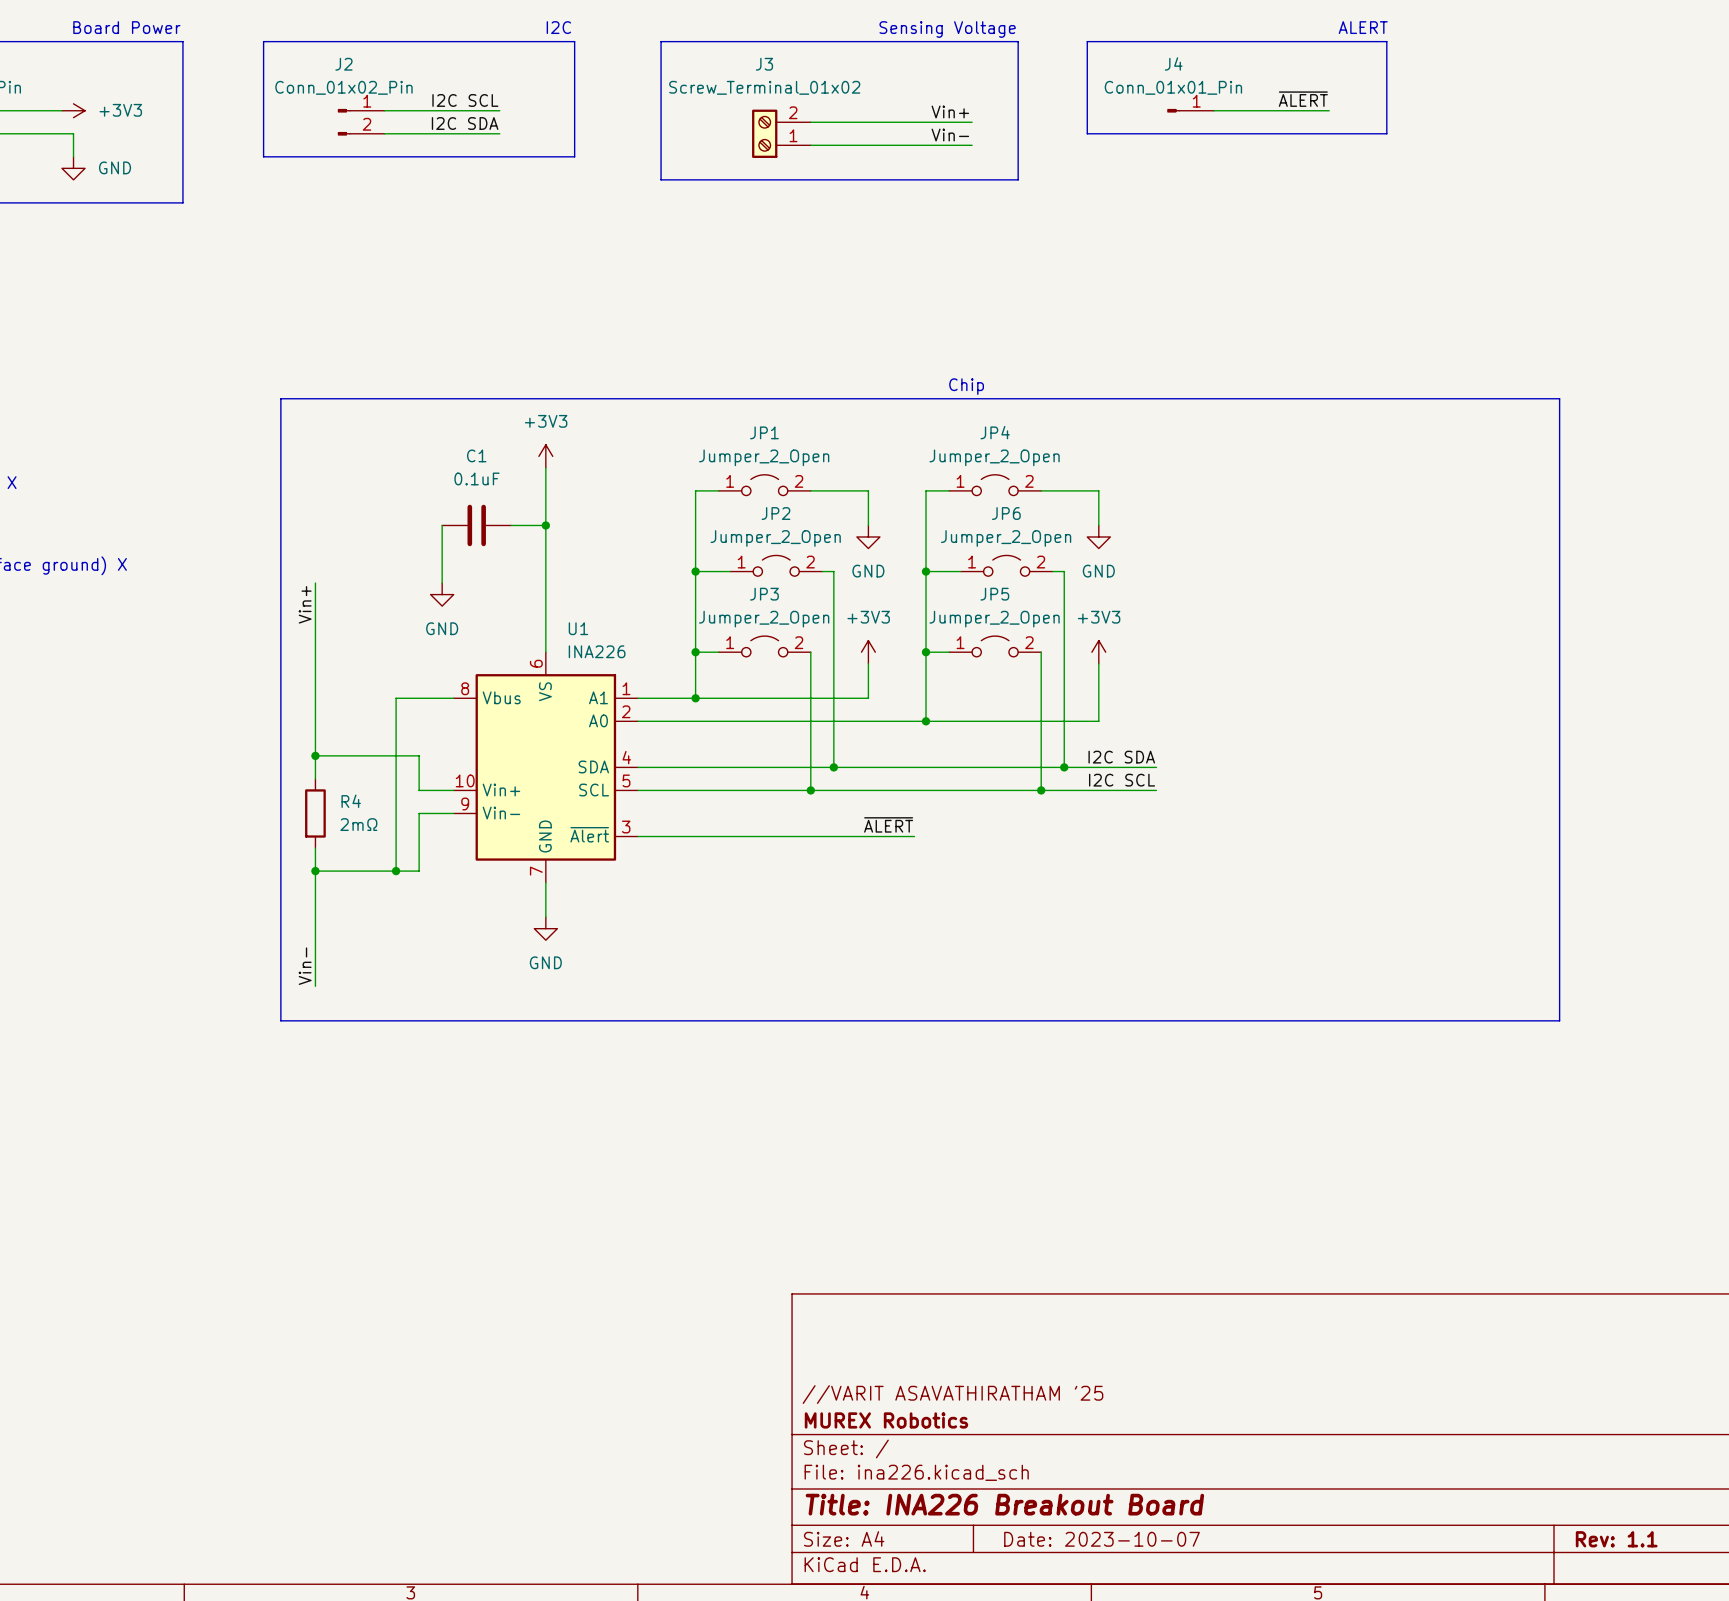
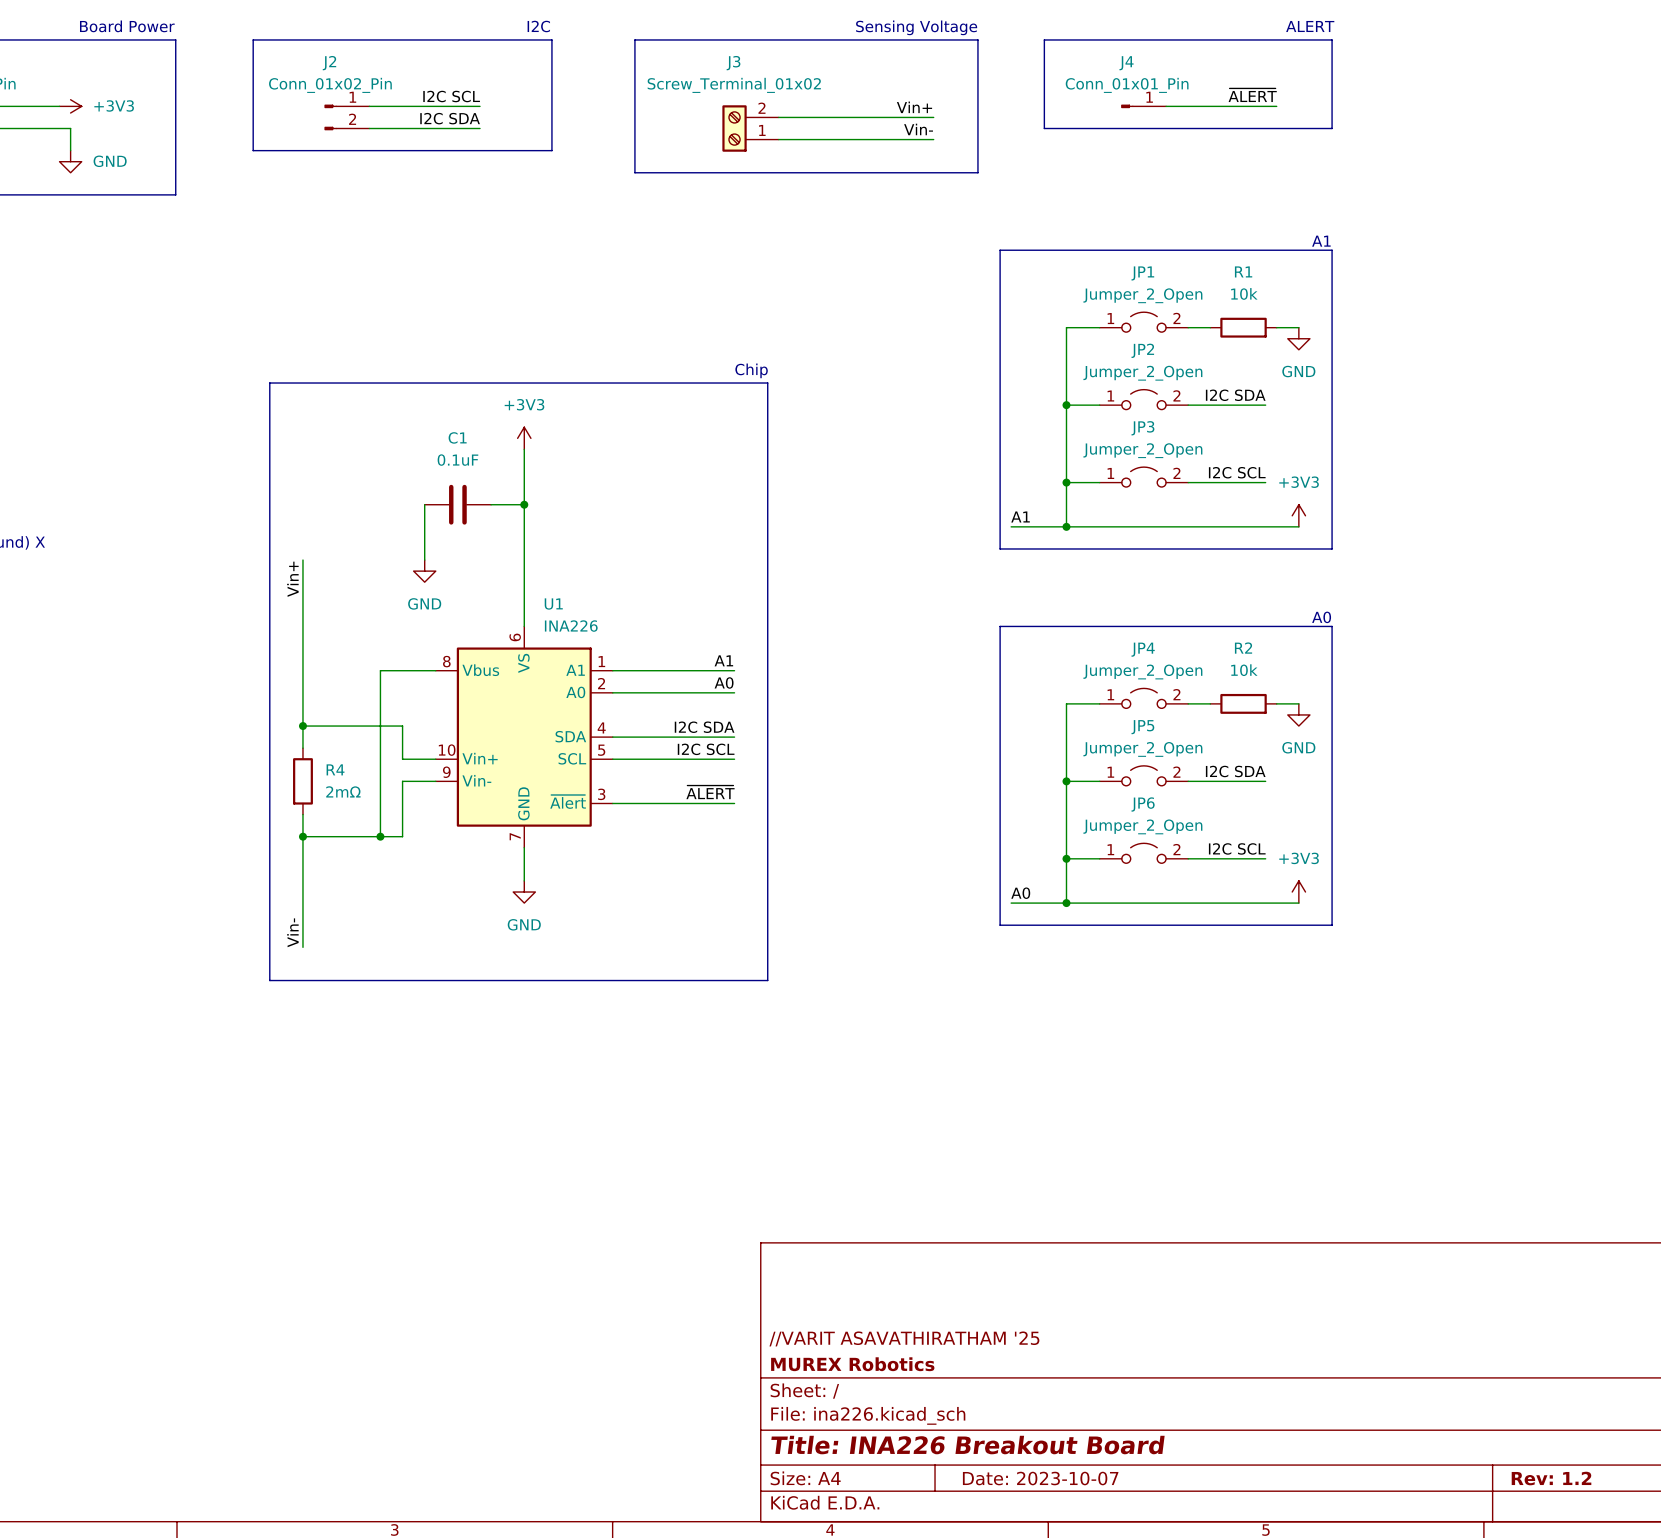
text: none -> A1 (1321, 241)
line: none -> (1000, 250) (1332, 250) (1332, 548) (1000, 548) (1000, 250)
wire: none -> (1099, 327) (1066, 327) (1066, 526)
wire: none -> (1188, 327) (1210, 327)
R1: none -> 10k (1243, 327)
wire: none -> (1276, 327) (1298, 327)
power symbol: none -> GND (1298, 338)
text position: Chip (966, 386) -> Chip (751, 370)
line: (799, 398) (1559, 398) (1559, 1020) (799, 1020) -> (767, 383) (767, 980)
label: none -> I2C SDA (1235, 395)
wire: none -> (1066, 405) (1099, 405)
junction: none -> (1066, 405)
wire: none -> (1188, 405) (1265, 405)
JP1 position: (764, 485) -> (1143, 322)
JP4 position: (995, 485) -> (1143, 698)
wire: (718, 490) (695, 490) (695, 698) -> none
wire: (810, 490) (868, 490) (868, 525) -> none
wire: (949, 490) (926, 490) (926, 721) -> none
wire: (1041, 490) (1098, 490) (1098, 525) -> none
label: none -> I2C SCL (1237, 472)
junction: none -> (1066, 482)
wire: none -> (1188, 482) (1265, 482)
power symbol: GND (868, 536) -> none
power symbol: GND (1098, 536) -> none
power symbol: none -> +3V3 (1298, 515)
label: none -> A1 (1020, 516)
wire: none -> (1011, 526) (1298, 526)
junction: none -> (1066, 526)
JP2 position: (776, 565) -> (1143, 399)
JP6 position: (1006, 565) -> (1143, 853)
wire: (695, 571) (730, 571) -> none
junction: (695, 571) -> none
wire: (822, 571) (833, 571) (833, 767) -> none
wire: (926, 571) (960, 571) -> (1066, 482) (1099, 482)
junction: (926, 571) -> none
wire: (1052, 571) (1064, 571) (1064, 767) -> none
text: none -> A0 (1321, 617)
JP3 position: (764, 646) -> (1143, 477)
JP5 position: (995, 646) -> (1143, 775)
wire: (695, 652) (718, 652) -> none
junction: (695, 652) -> none
wire: (810, 652) (810, 790) -> none
power symbol: +3V3 (868, 652) -> none
wire: (926, 652) (949, 652) -> none
junction: (926, 652) -> none
line: none -> (1000, 626) (1000, 925) (1332, 925) (1332, 626) (1000, 626)
power symbol: +3V3 (1098, 652) -> none
wire: (868, 663) (868, 698) (764, 698) -> none
wire: (1098, 663) (1098, 721) (764, 721) -> none
label: none -> A1 (723, 660)
junction: (695, 698) -> none
label: none -> A0 (724, 682)
junction: (926, 721) -> none
wire: none -> (1099, 703) (1066, 703) (1066, 903)
wire: none -> (1188, 703) (1210, 703)
R2: none -> 10k (1243, 703)
wire: none -> (1276, 703) (1298, 703)
power symbol: none -> GND (1298, 714)
label: none -> I2C SDA (704, 727)
label position: I2C SDA (1121, 757) -> I2C SDA (1235, 771)
wire: (764, 767) (1156, 767) -> none
junction: (833, 767) -> none
junction: (1064, 767) -> none
label: none -> I2C SCL (706, 749)
label: I2C SCL (1122, 780) -> none
wire: (764, 790) (1156, 790) -> none
junction: (810, 790) -> none
junction: (1041, 790) -> none
wire: none -> (1066, 781) (1099, 781)
junction: none -> (1066, 781)
wire: none -> (1188, 781) (1265, 781)
label position: ~{ALERT} (888, 824) -> ~{ALERT} (710, 792)
wire: (764, 836) (914, 836) -> none
label: none -> I2C SCL (1237, 848)
wire: none -> (1066, 858) (1099, 858)
junction: none -> (1066, 858)
wire: none -> (1188, 858) (1265, 858)
power symbol: none -> +3V3 (1298, 892)
label: none -> A0 (1020, 893)
wire: none -> (1011, 903) (1298, 903)
junction: none -> (1066, 903)
title block: Rev: 1.1 (1616, 1539) -> Rev: 1.2 (1551, 1478)

